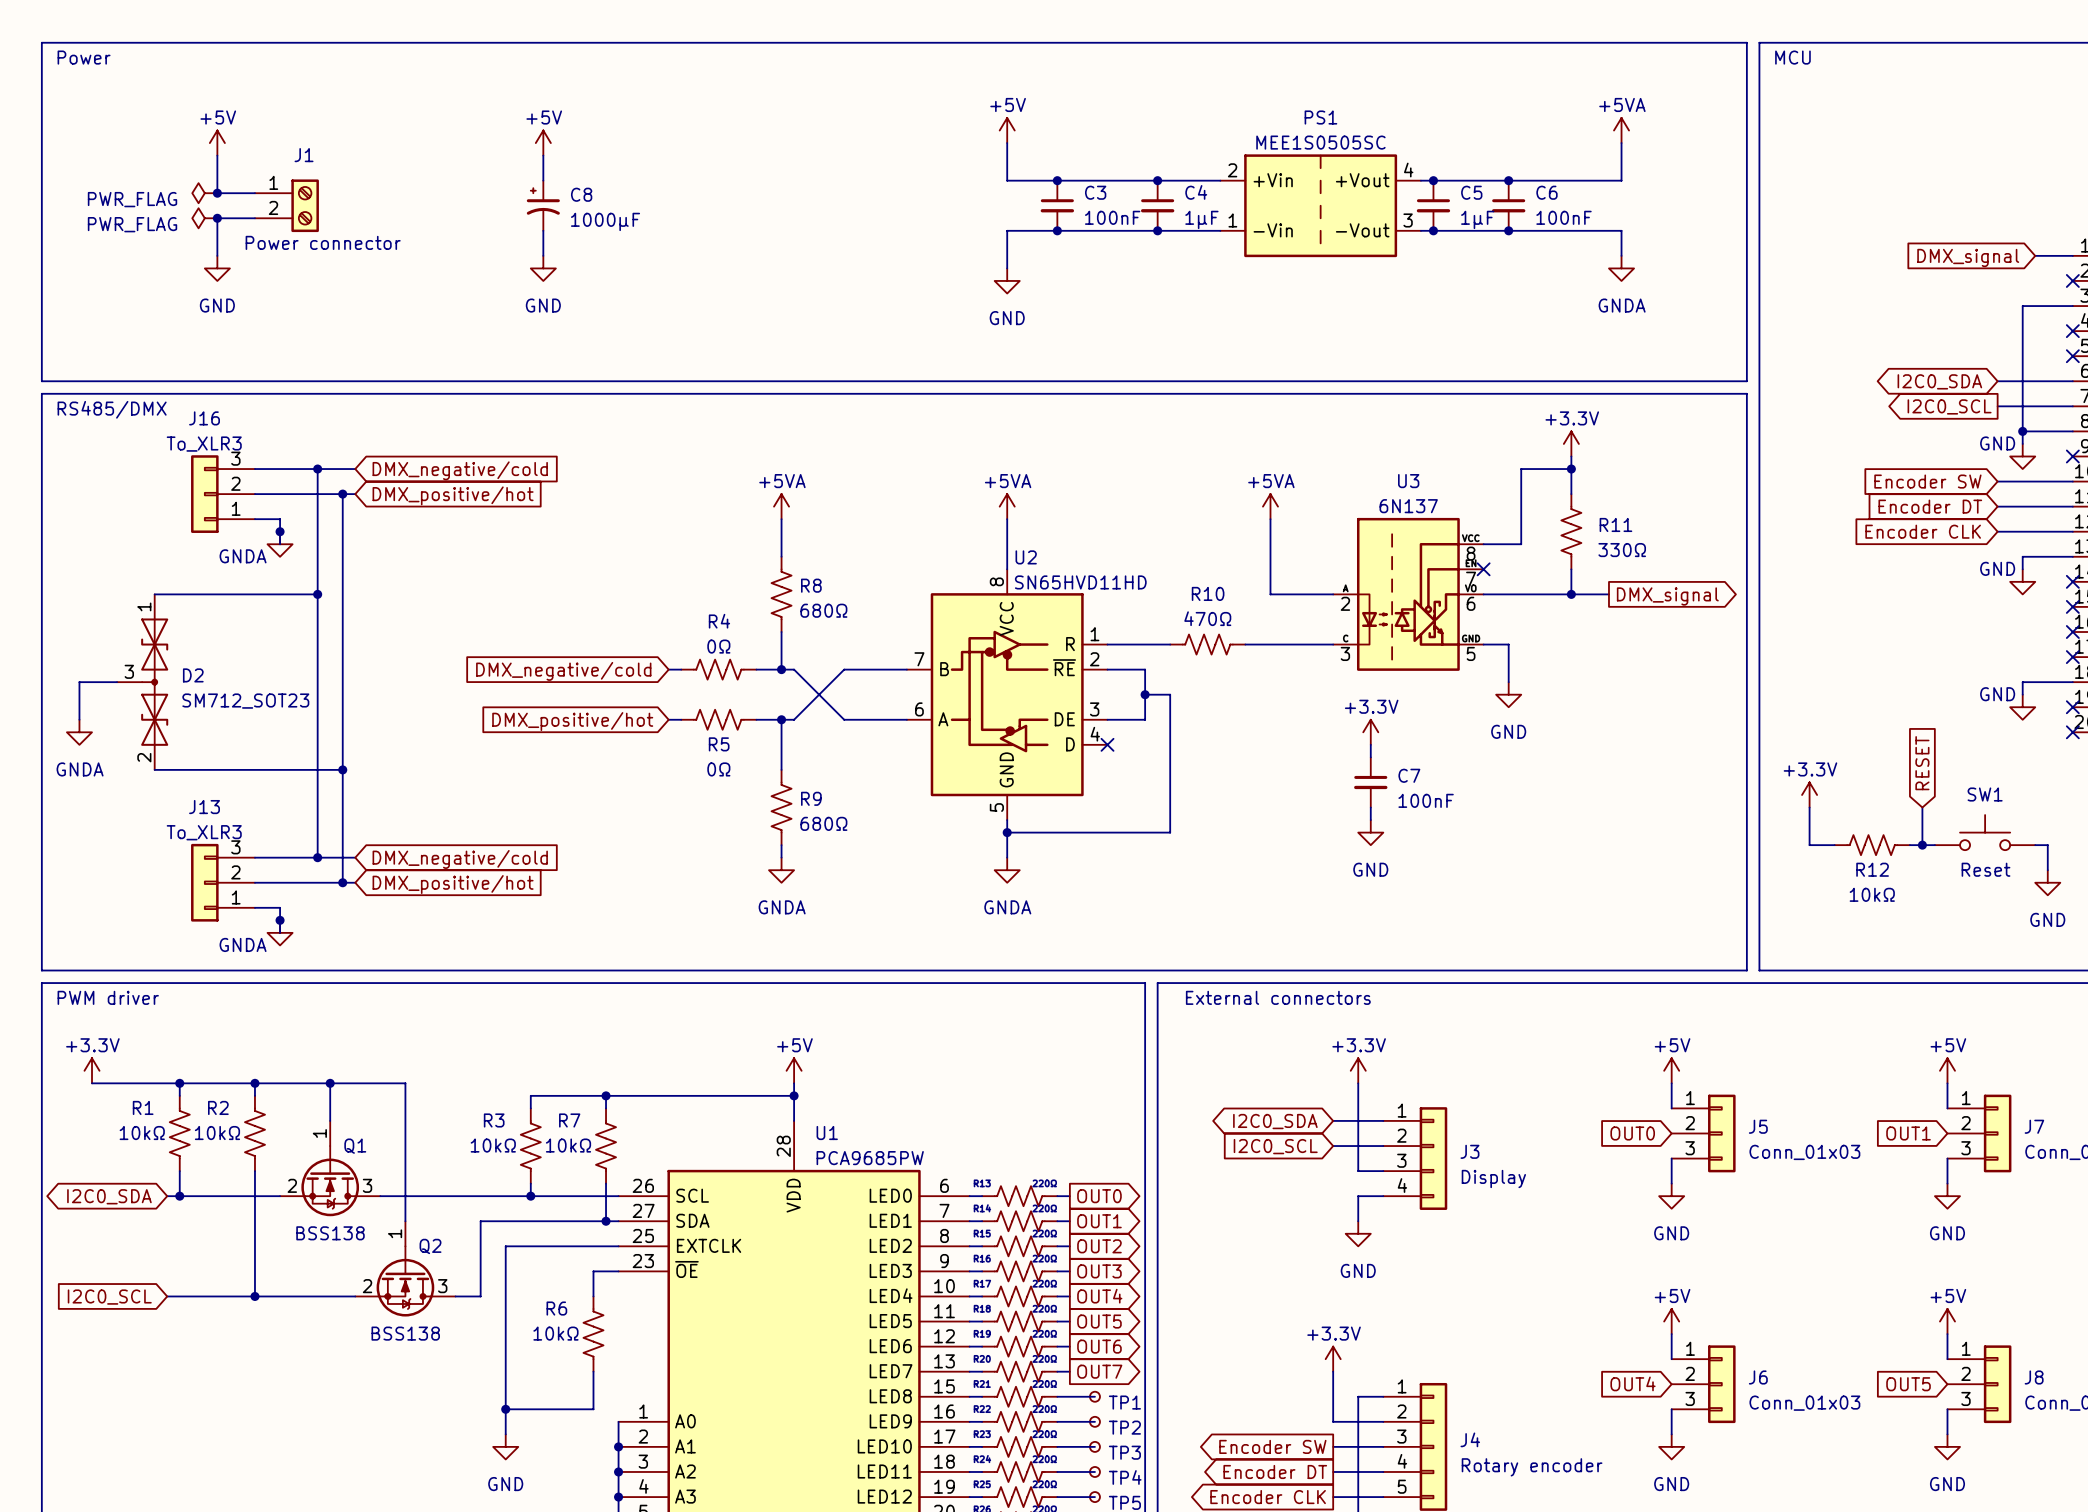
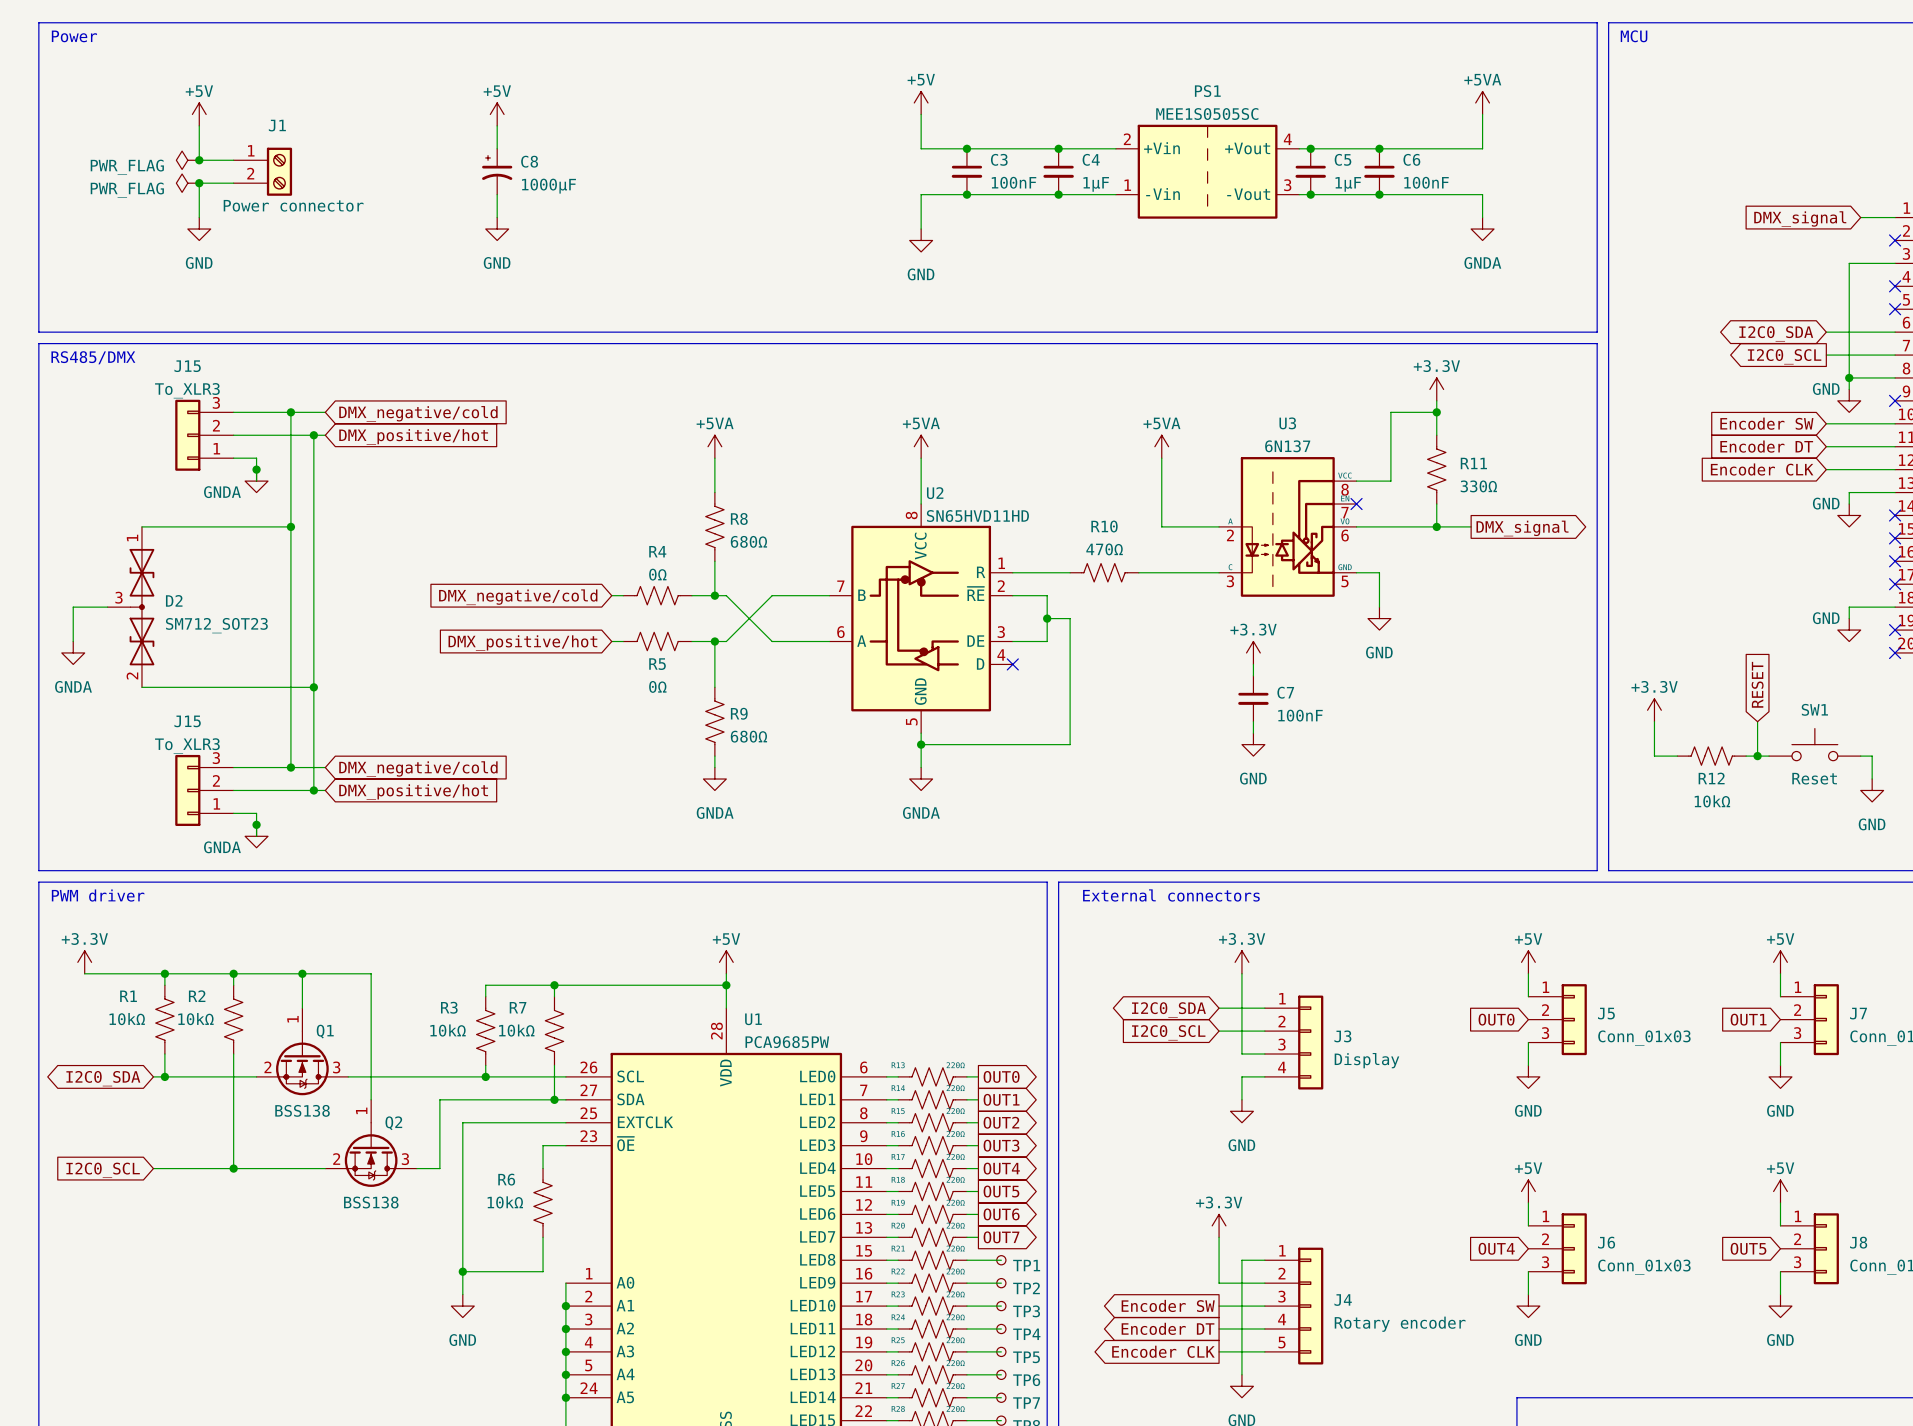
J16 name: J16 (204, 418) -> J15 (187, 366)
J13 name: J13 (204, 807) -> J15 (187, 721)

